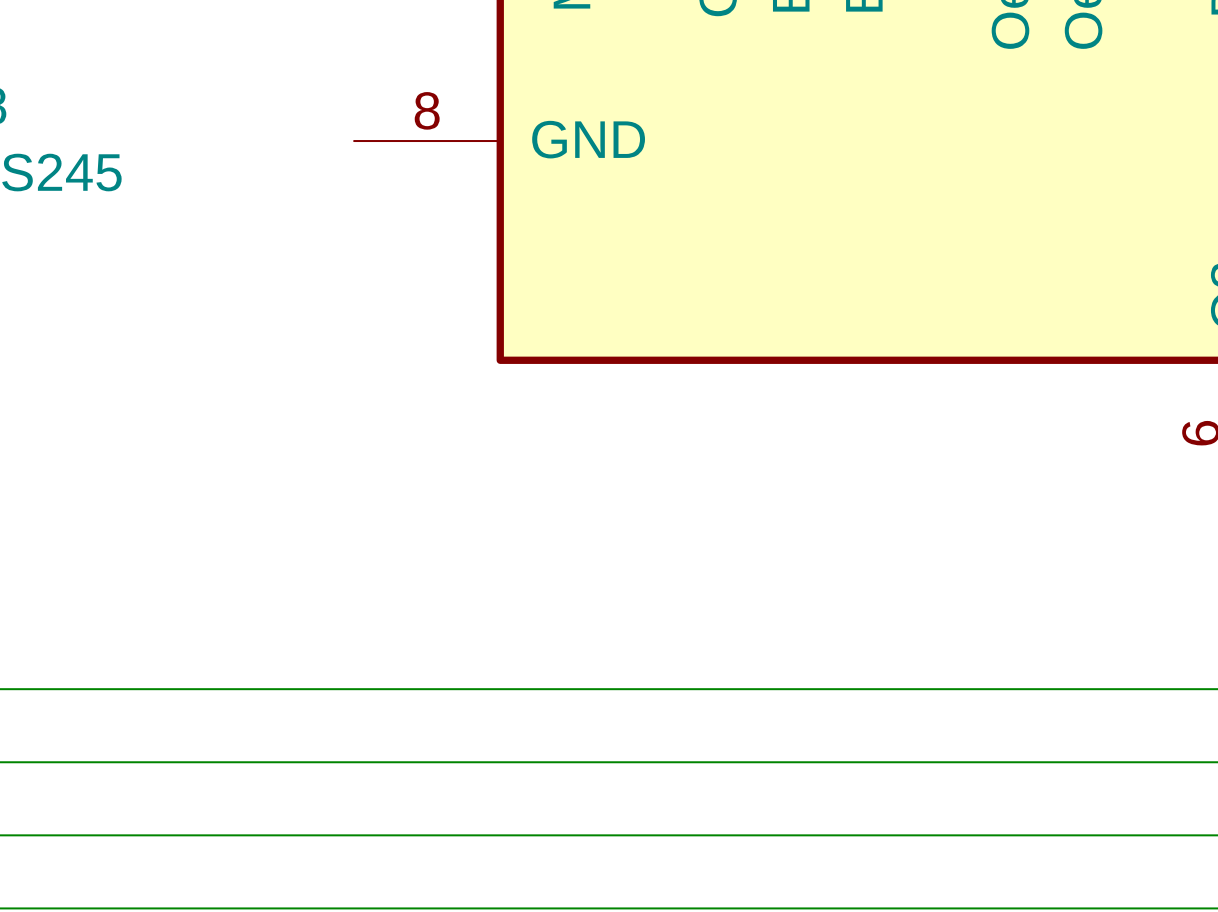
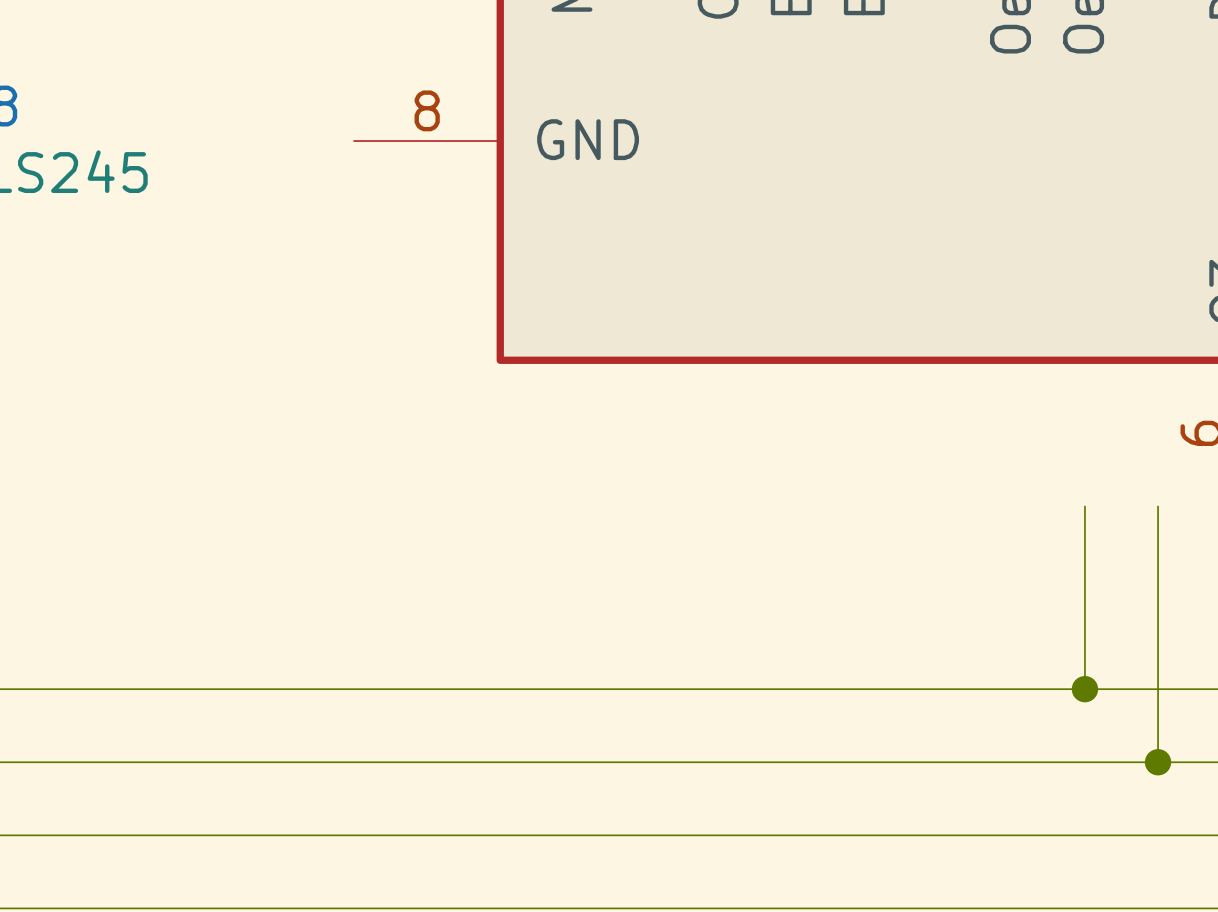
wire: none -> (1084, 506) (1084, 689)
wire: none -> (1158, 506) (1158, 762)
junction: none -> (1084, 689)
junction: none -> (1158, 762)

